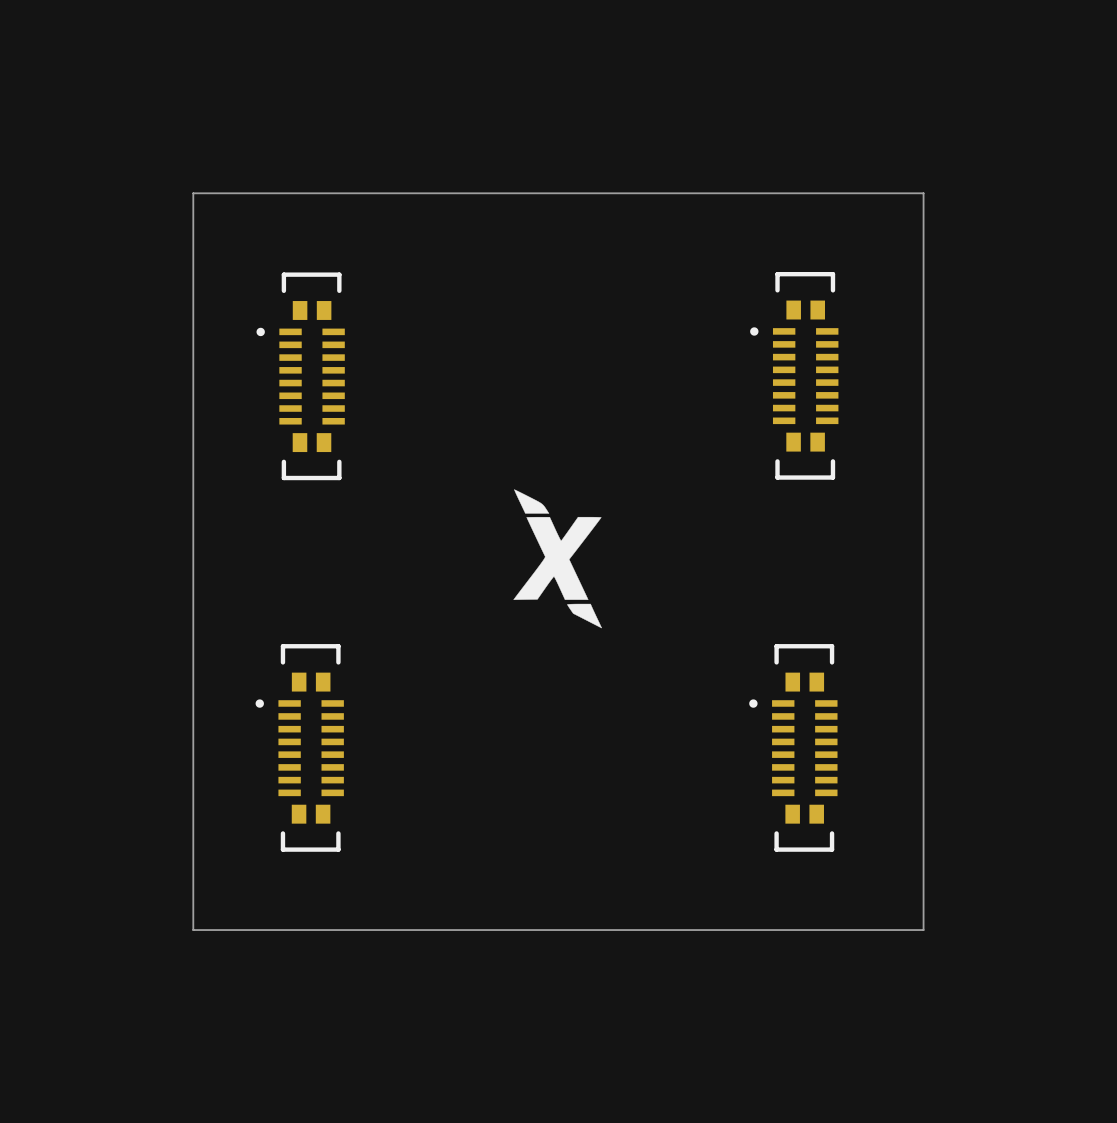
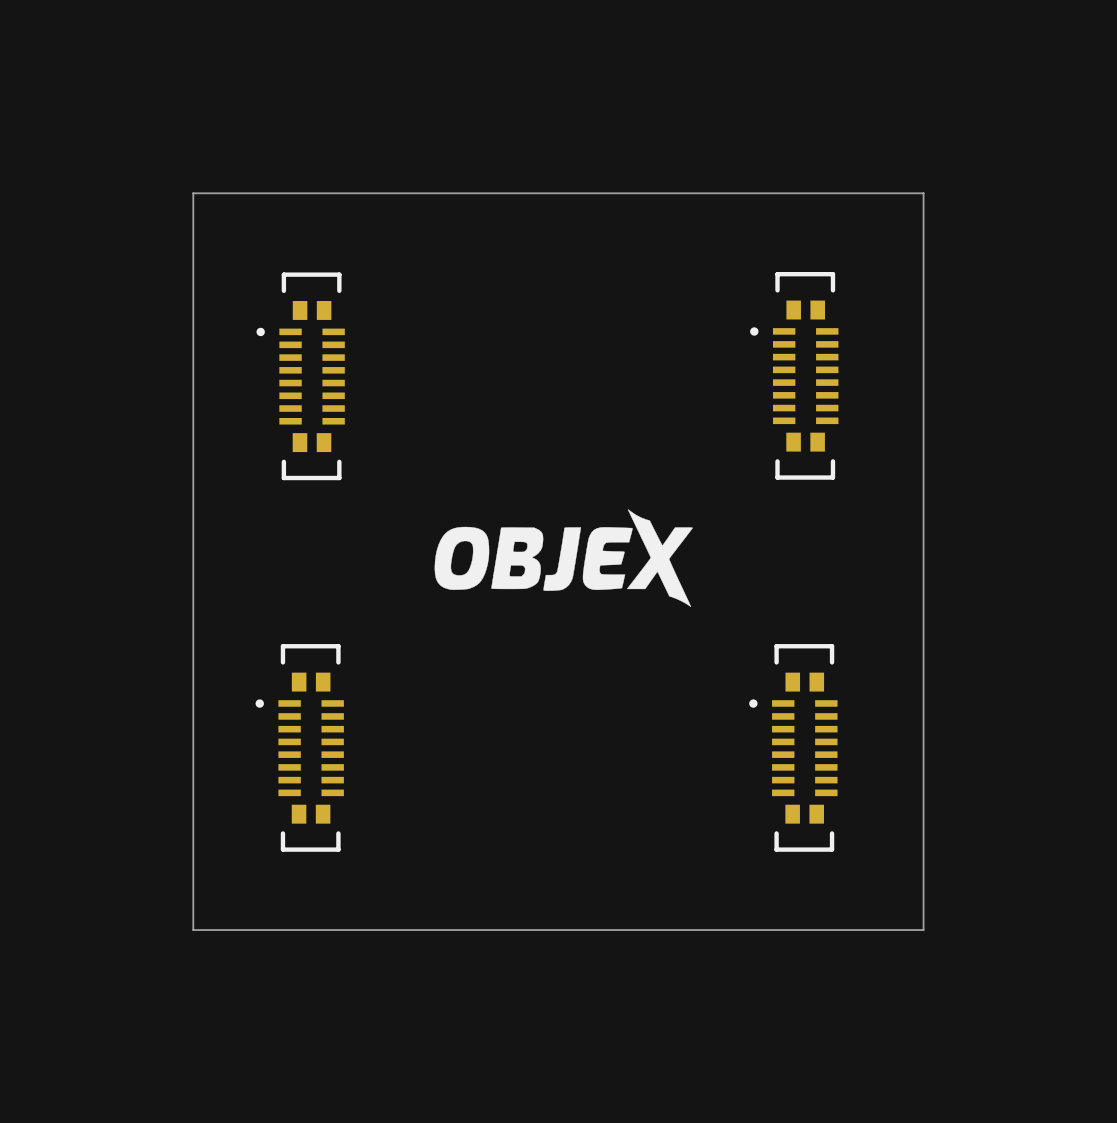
drawing shape: [513, 489, 602, 629] -> [434, 509, 693, 607]

